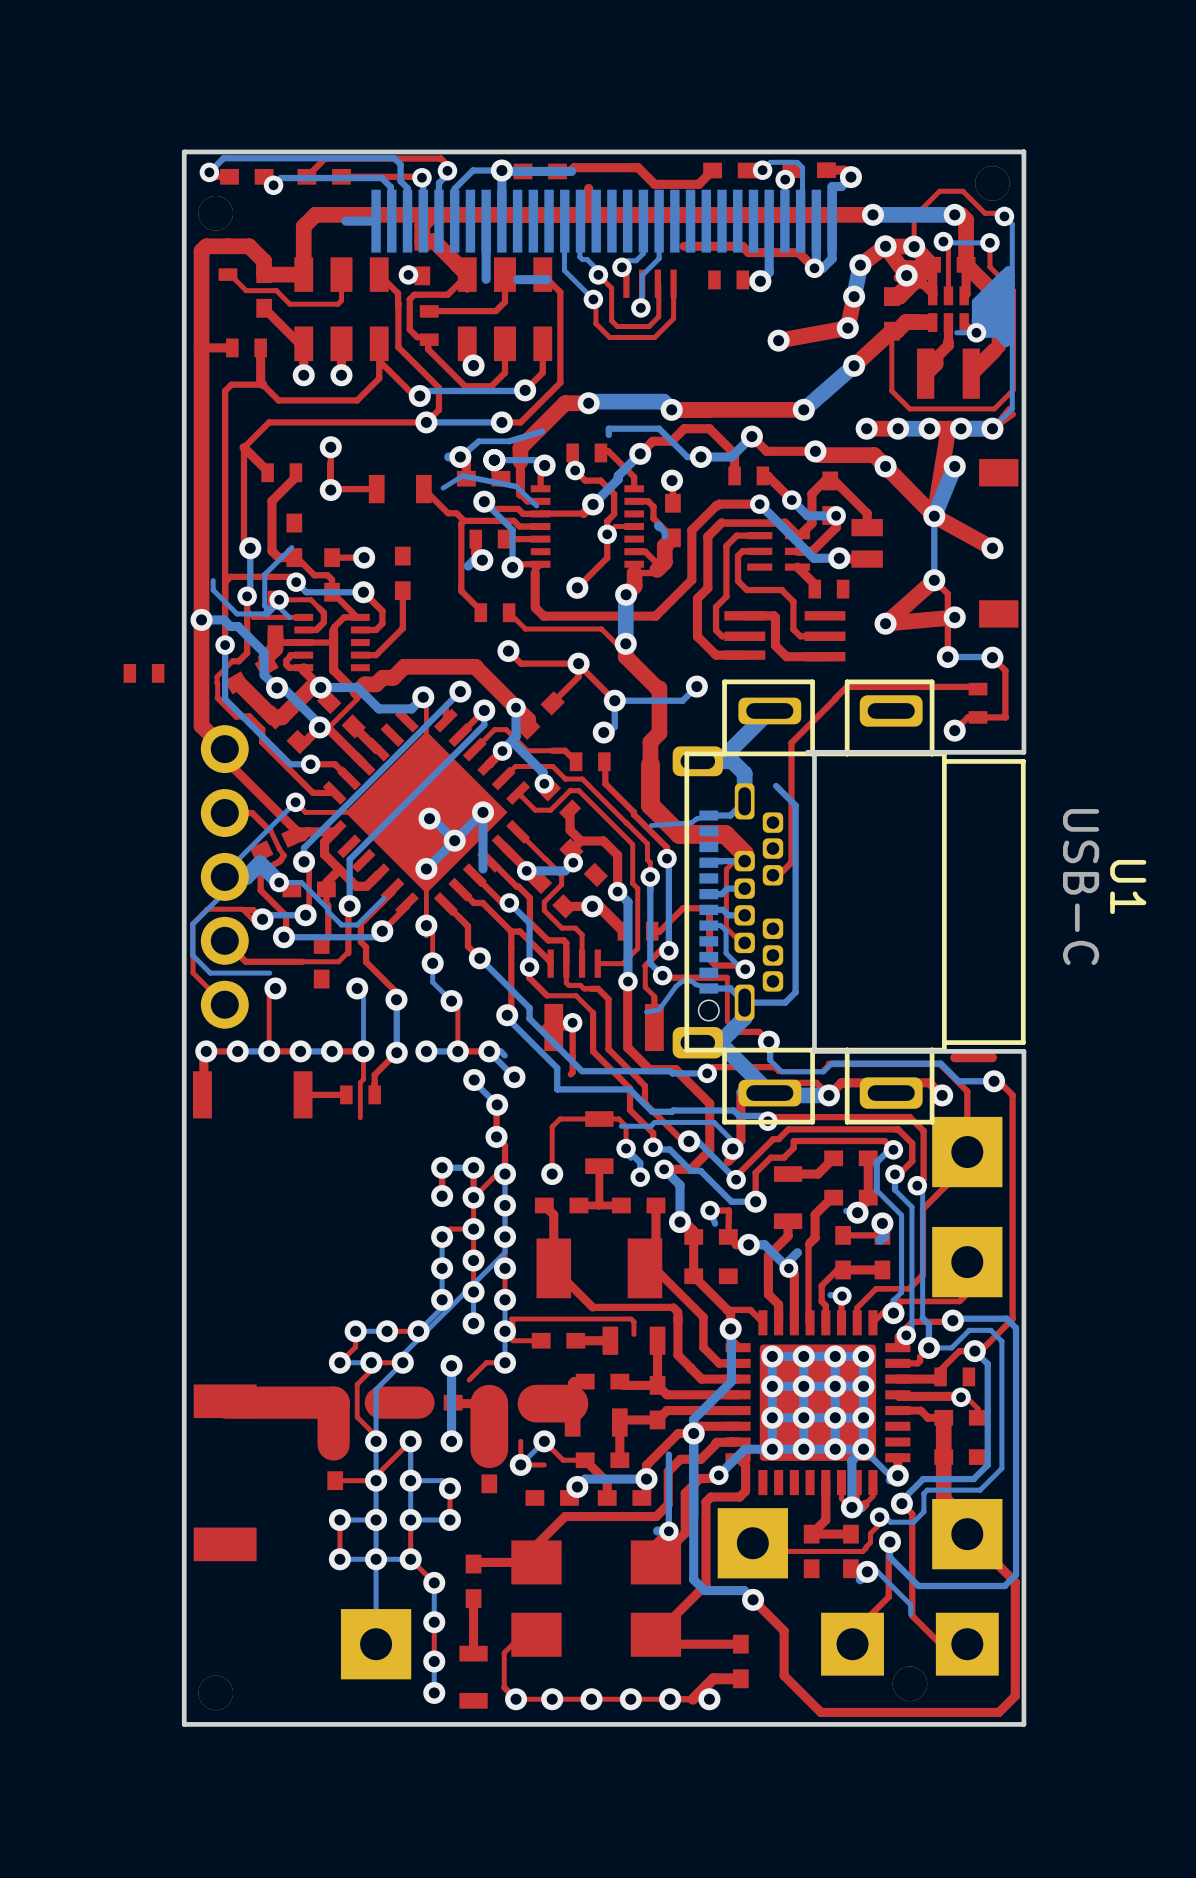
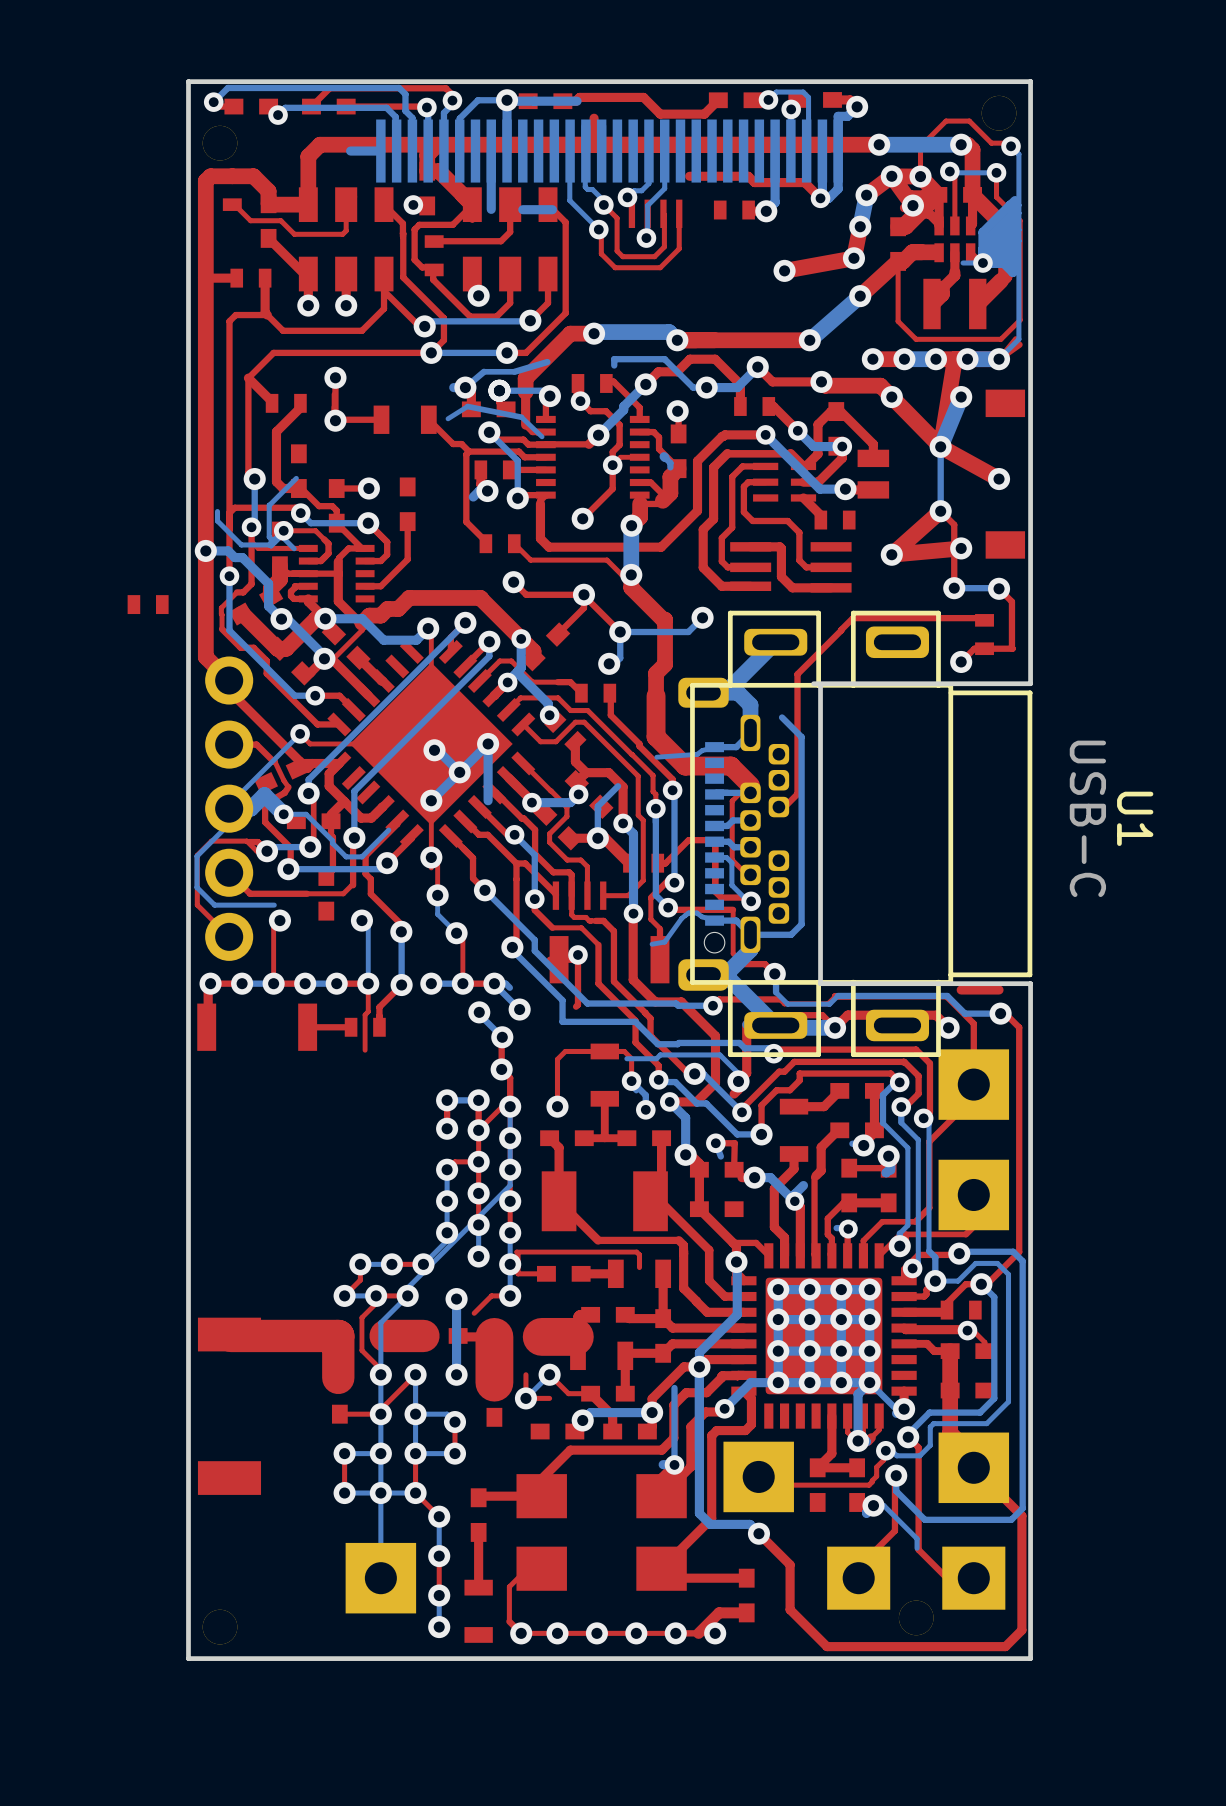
bottom track: none -> (618, 786) (597, 806) (597, 838)

